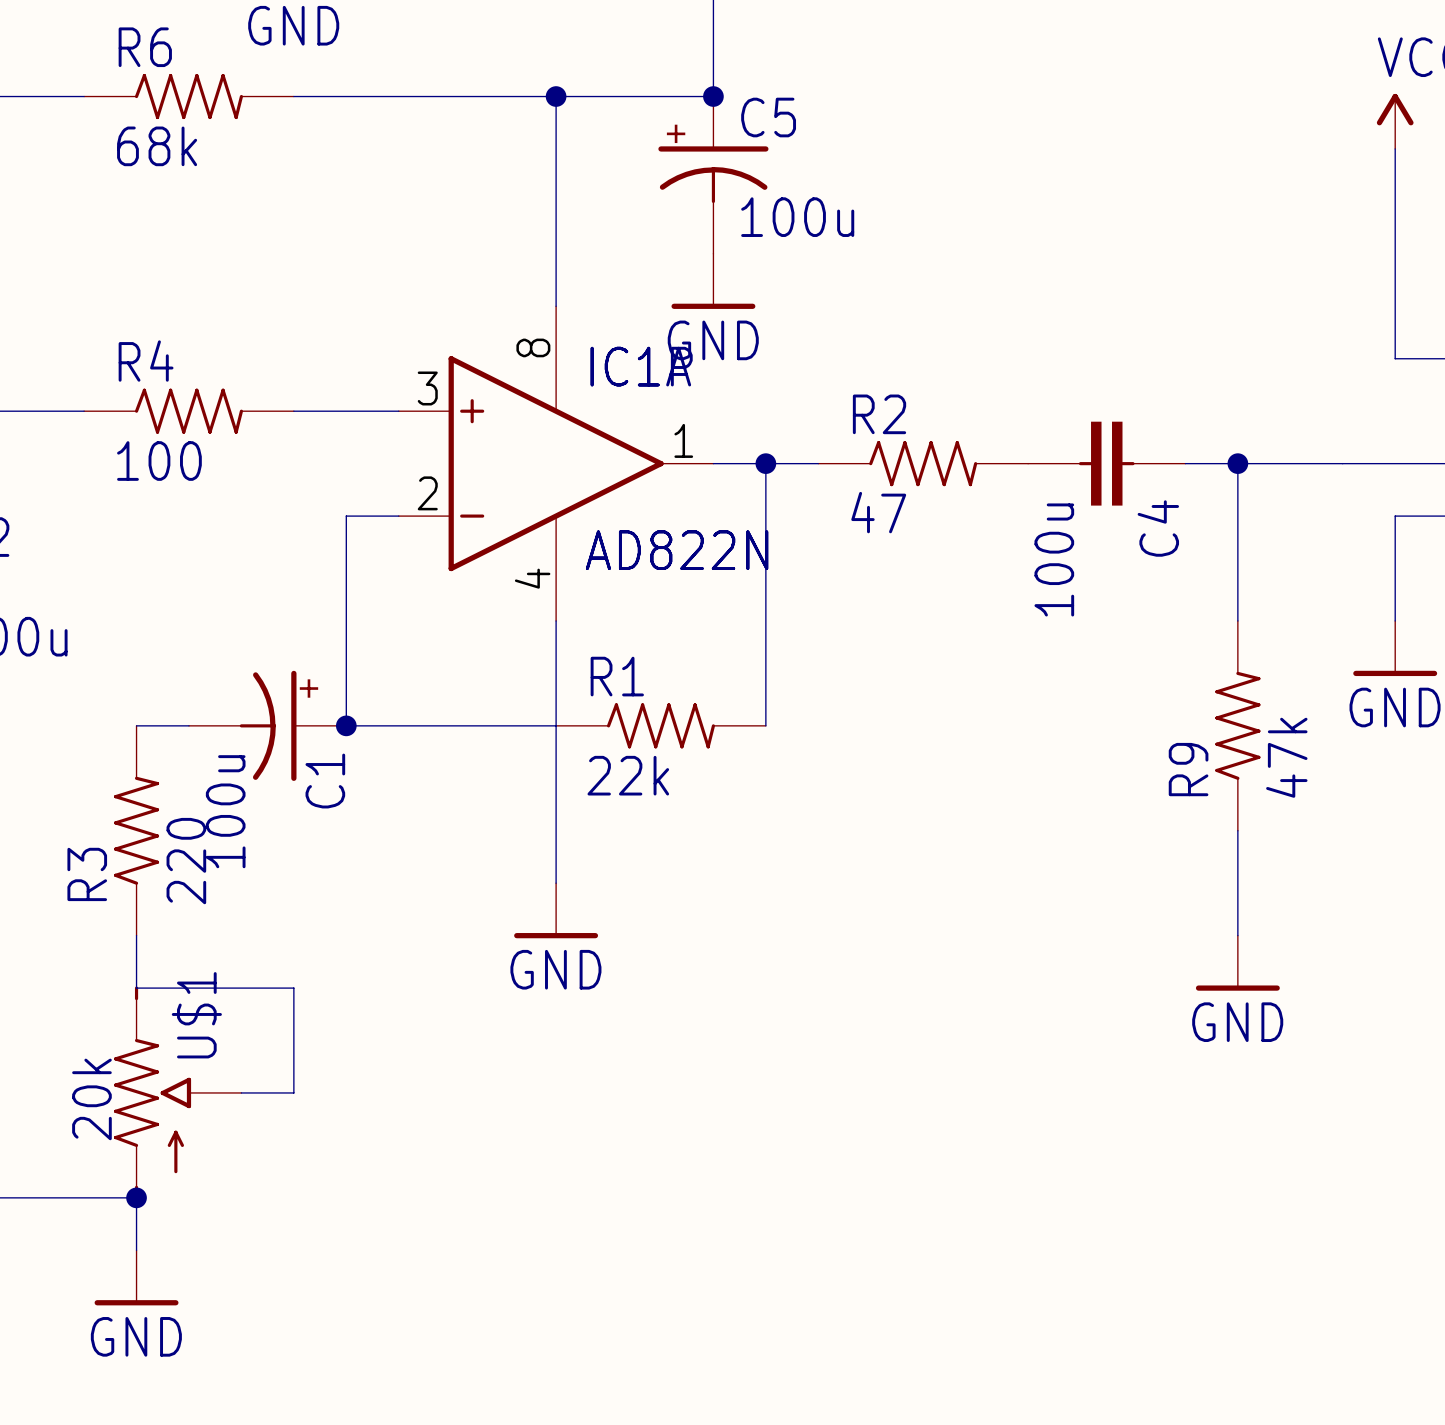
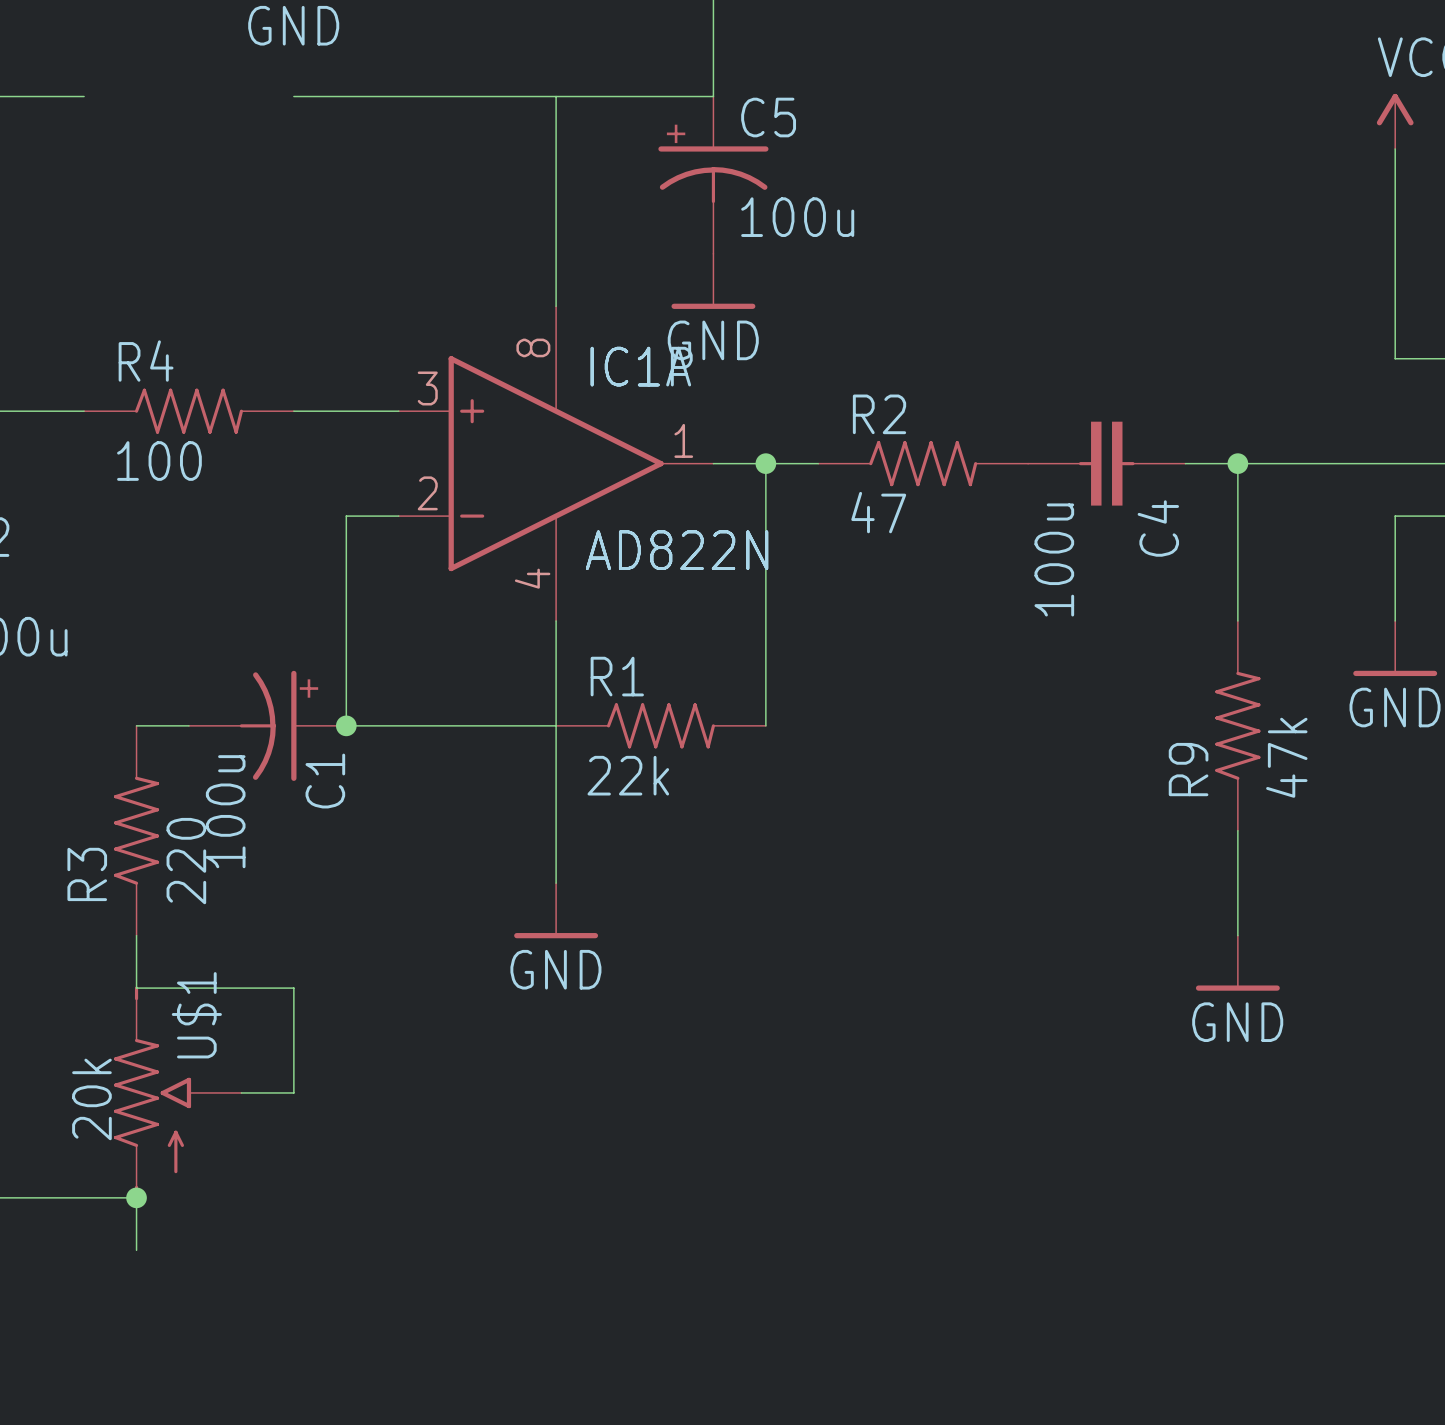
R6: 68k (188, 96) -> none
junction: (556, 96) -> none
junction: (713, 96) -> none
power symbol: GND (136, 1277) -> none

